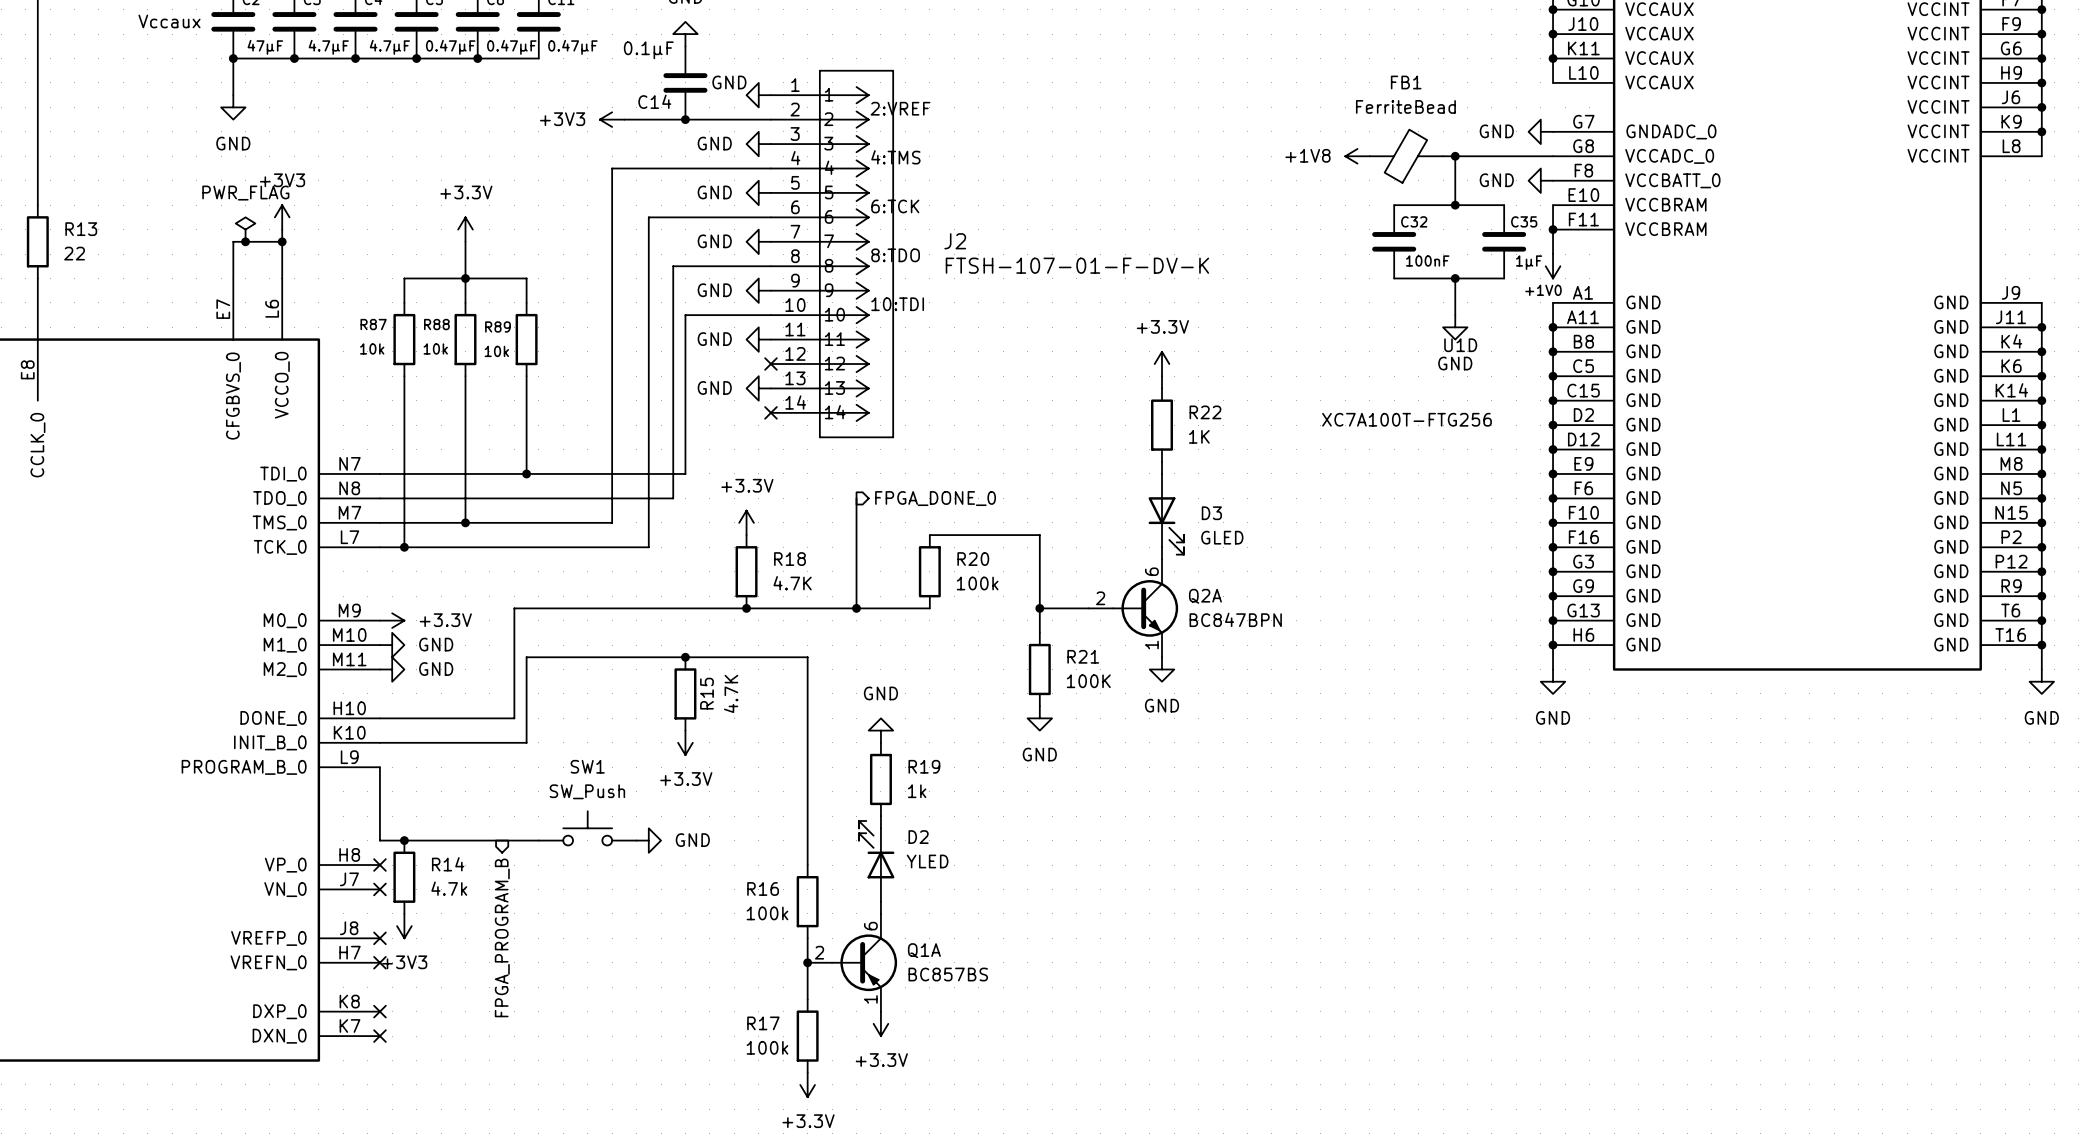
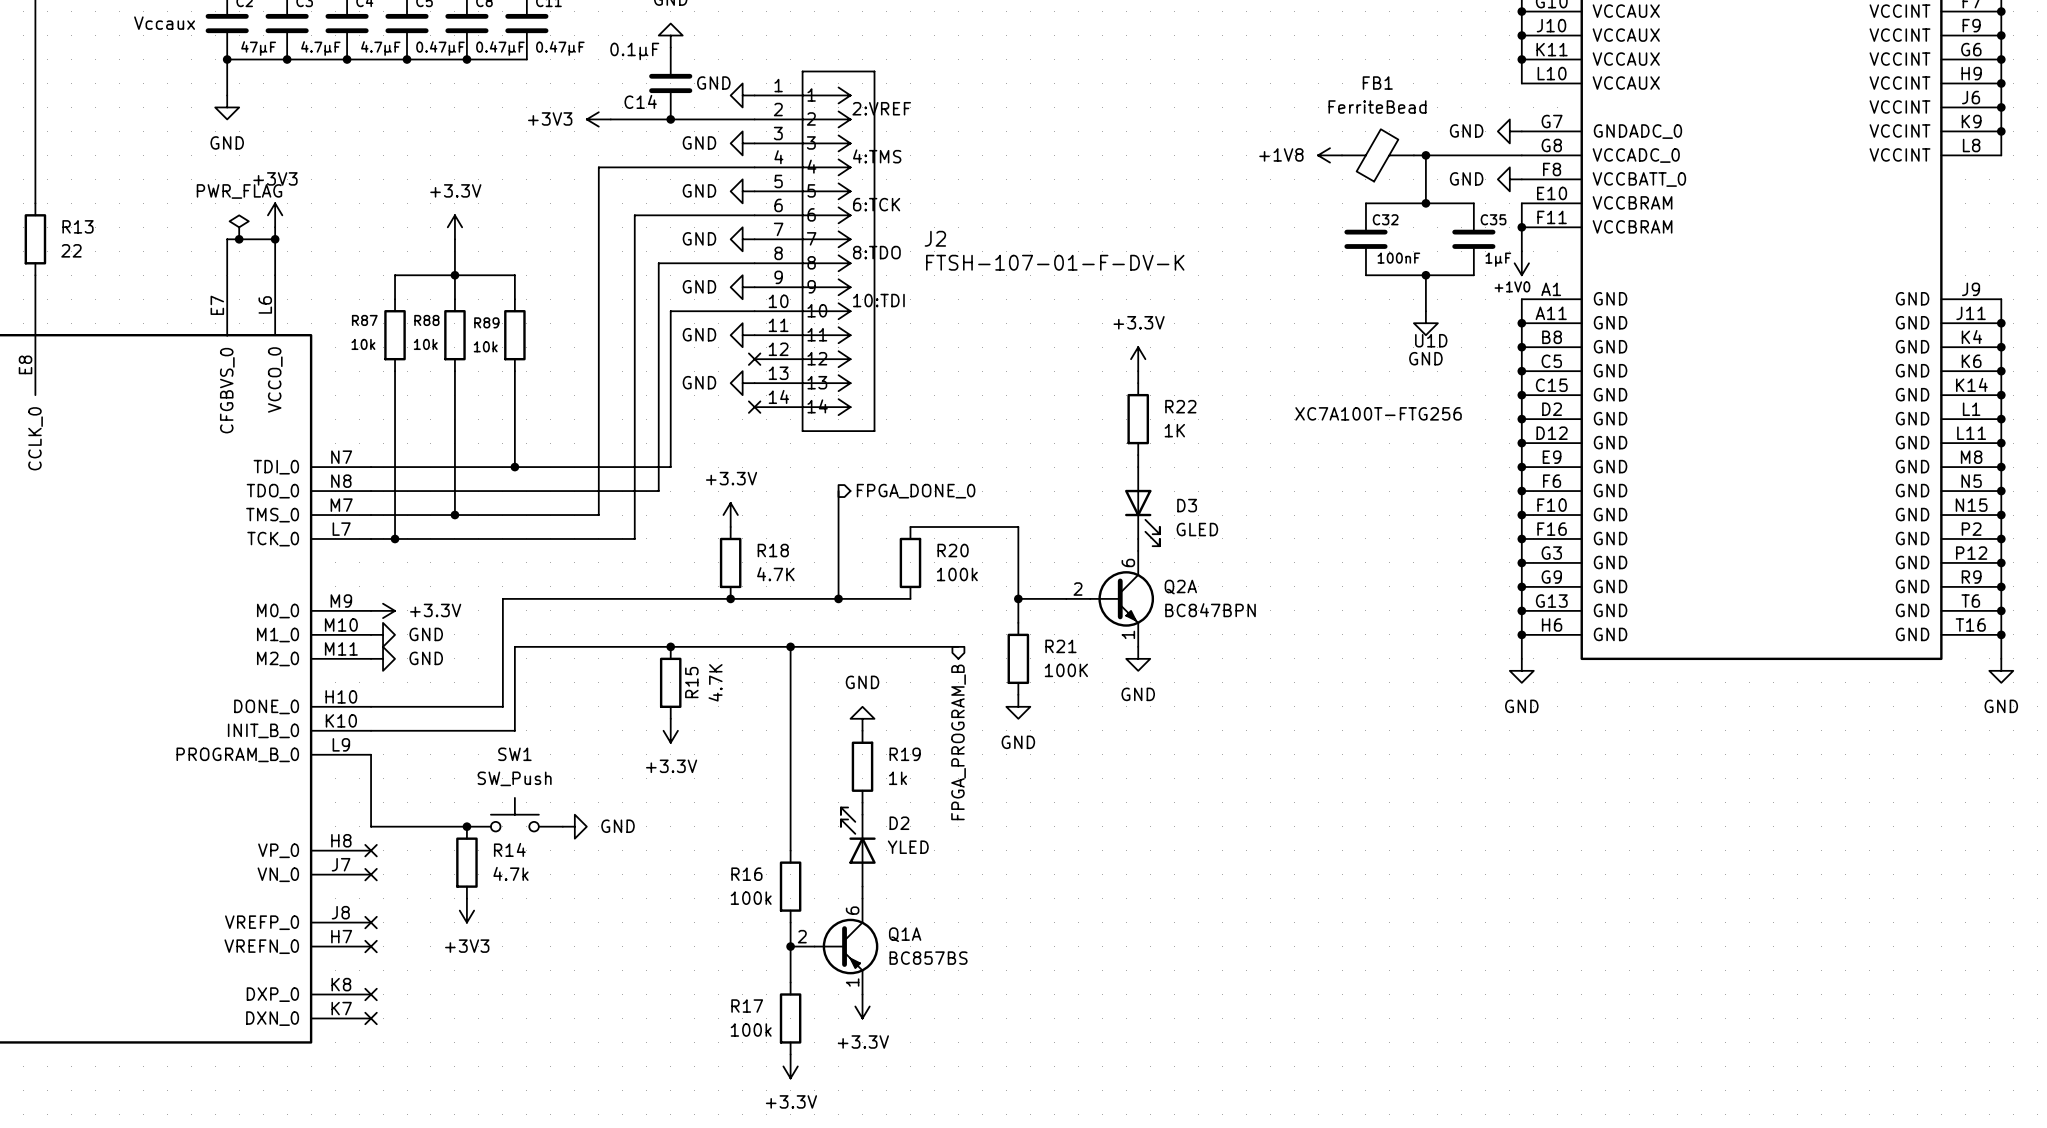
wire: none -> (790, 646) (958, 646)
junction: none -> (790, 646)
hierarchical label: none -> FPGA_PROGRAM_B (958, 742)
SW1 position: (587, 828) -> (514, 814)
junction: (404, 840) -> none
wire: (477, 840) (538, 840) -> none
junction: none -> (466, 826)
power symbol position: GND (648, 840) -> GND (574, 826)
R14 position: (404, 877) -> (466, 862)
power symbol position: +3V3 (404, 926) -> +3V3 (466, 910)
hierarchical label: FPGA_PROGRAM_B (502, 937) -> none

